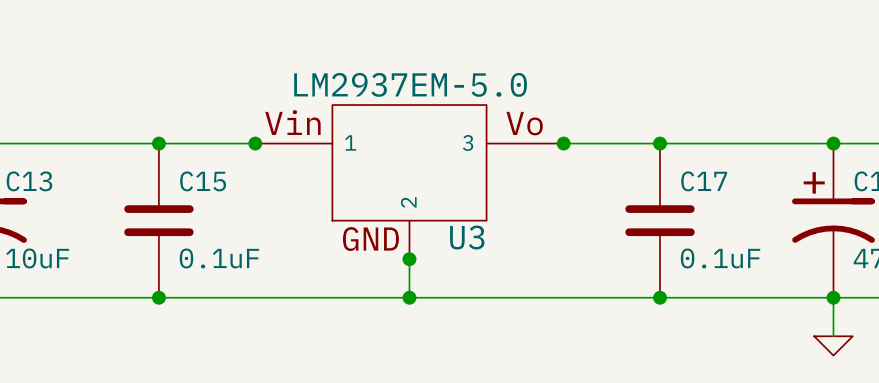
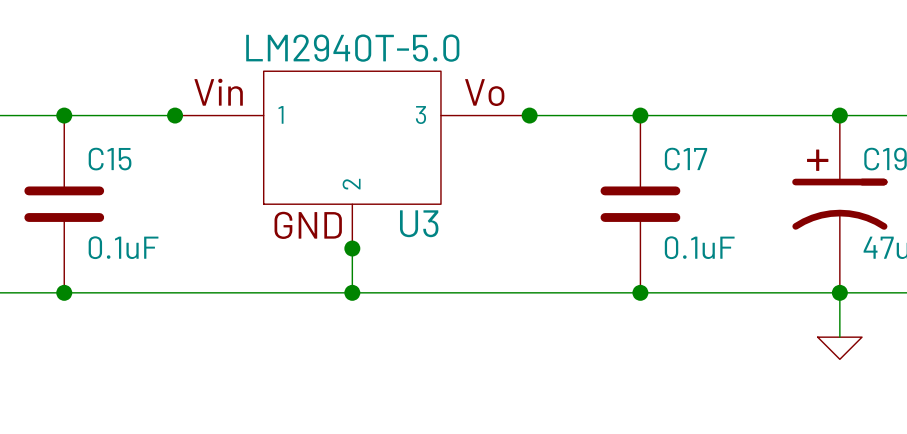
U3 value: LM2937EM-5.0 (410, 84) -> LM2940T-5.0 (352, 48)

